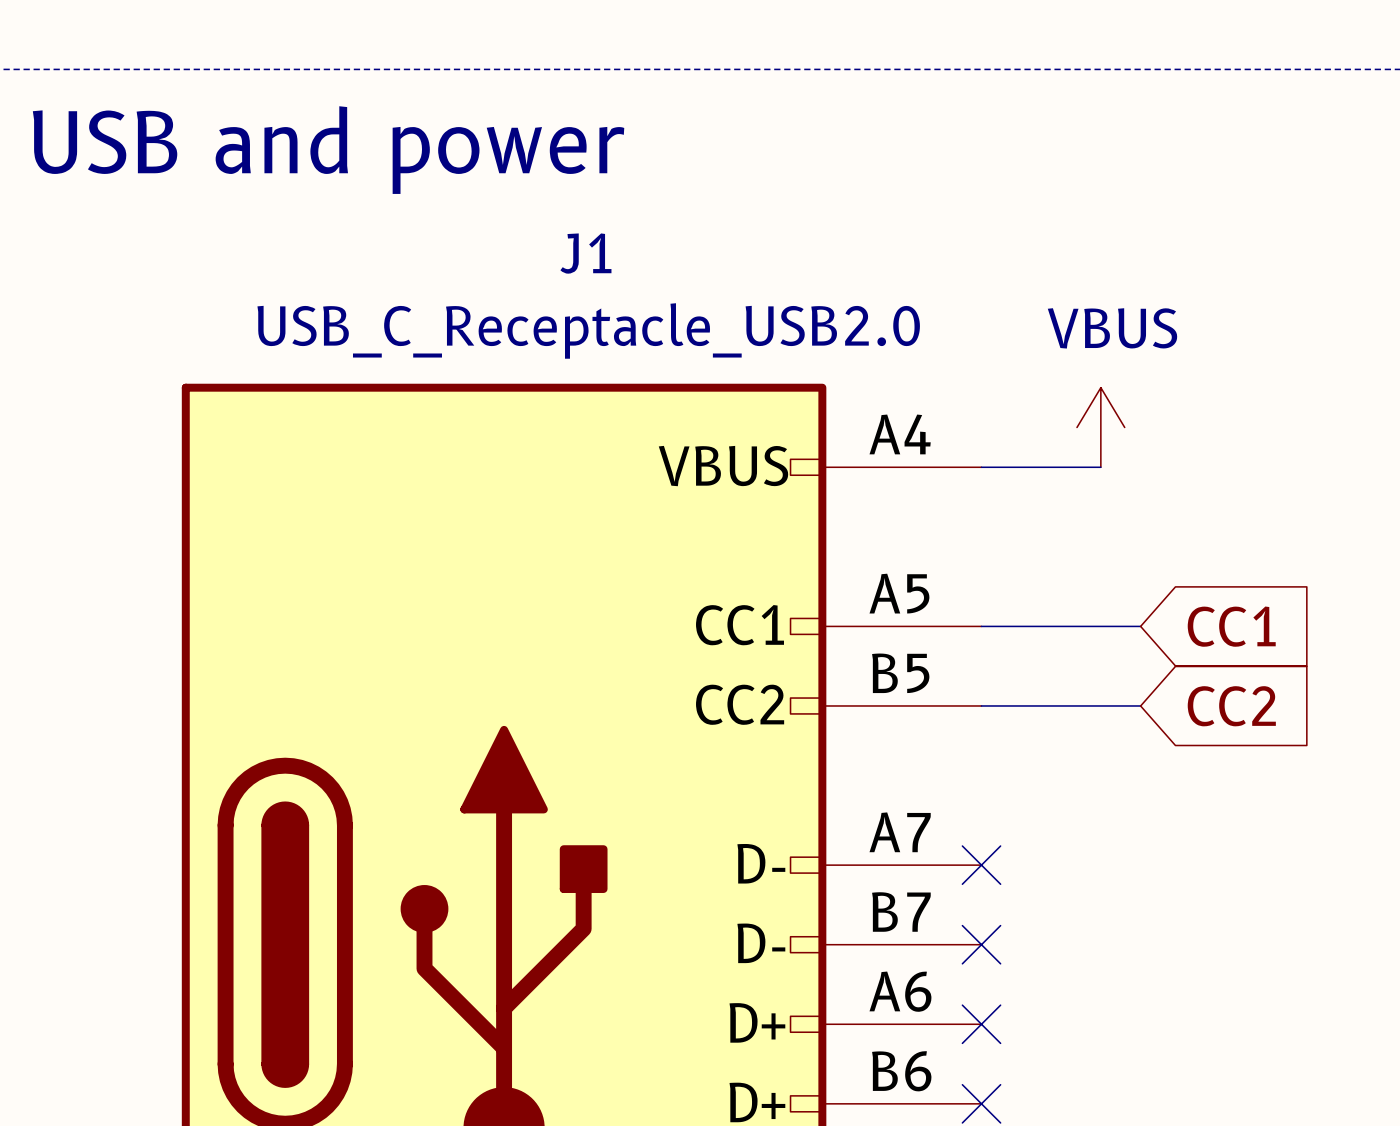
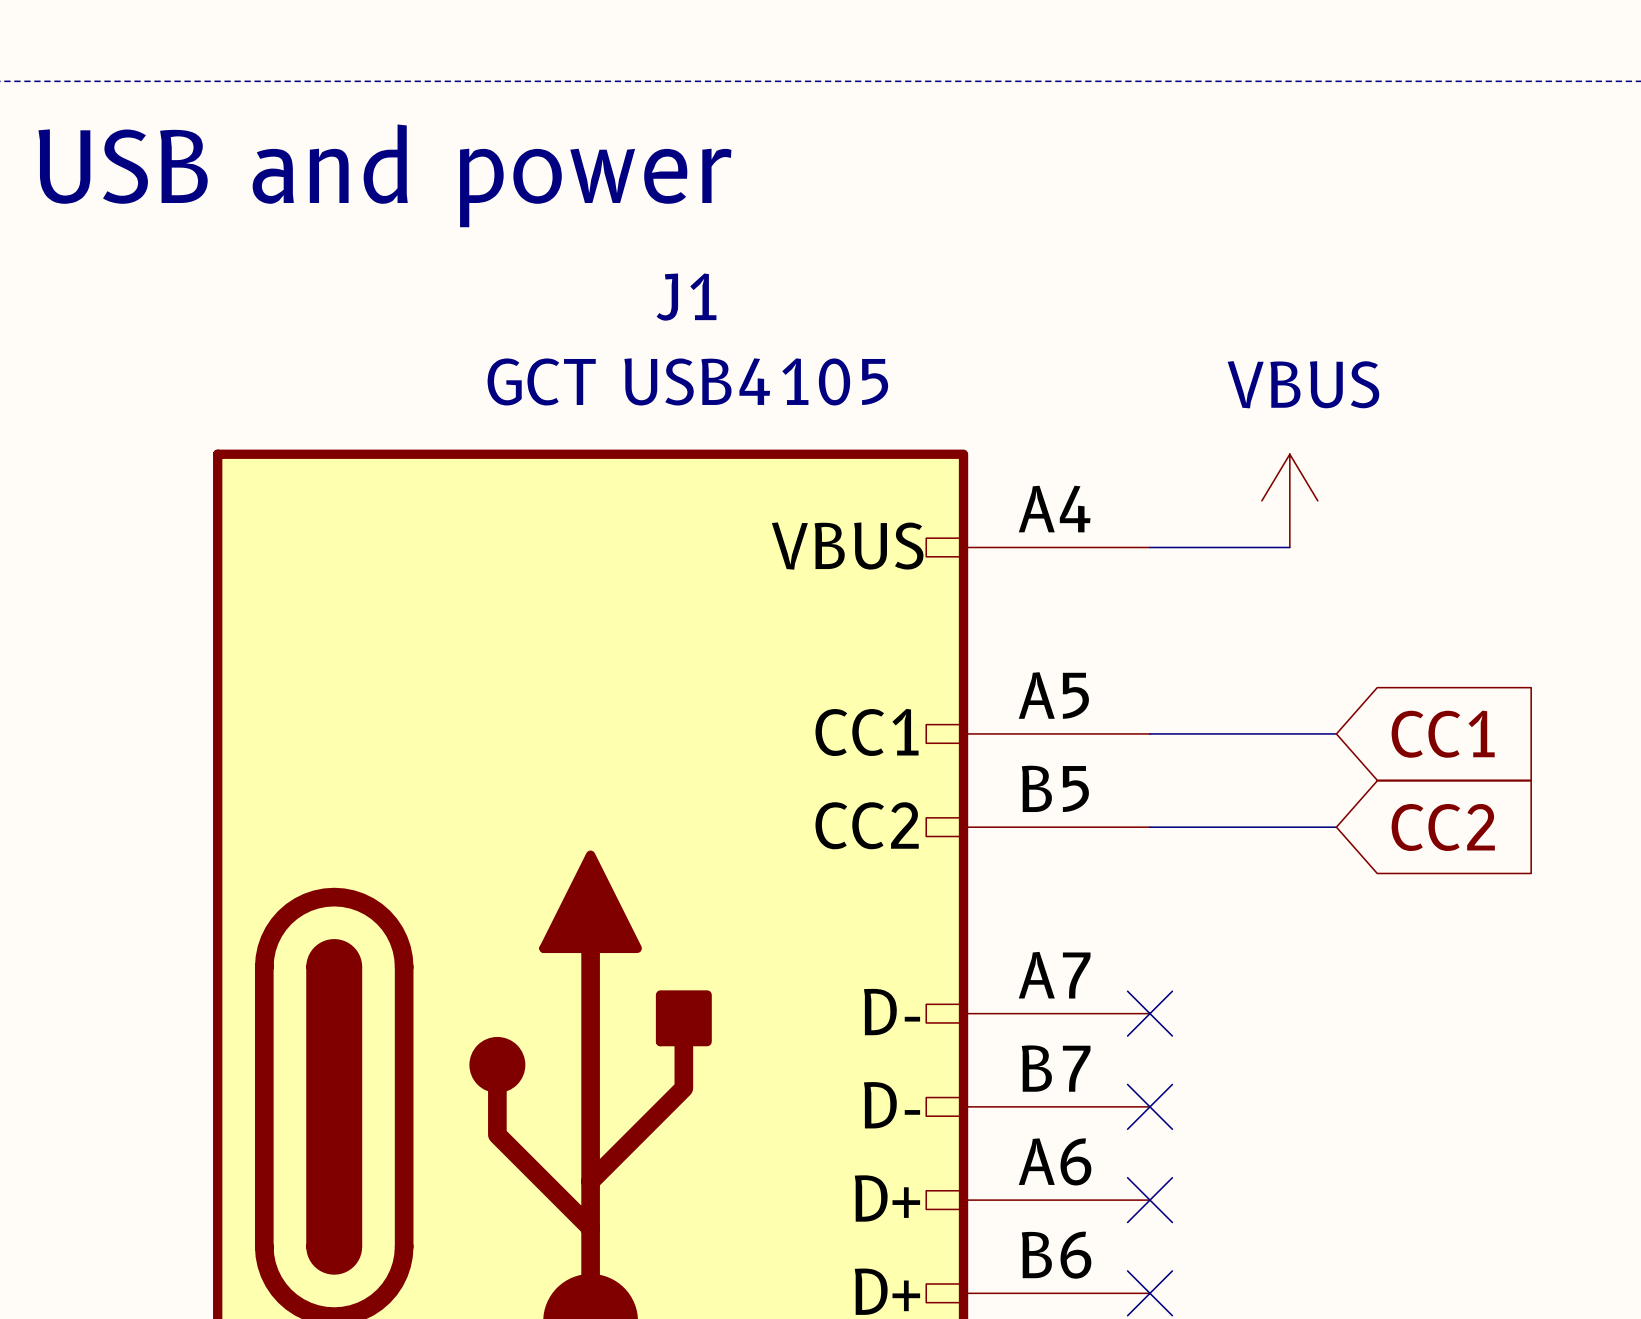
J1 value: USB_C_Receptacle_USB2.0 (588, 330) -> GCT USB4105 (687, 381)

